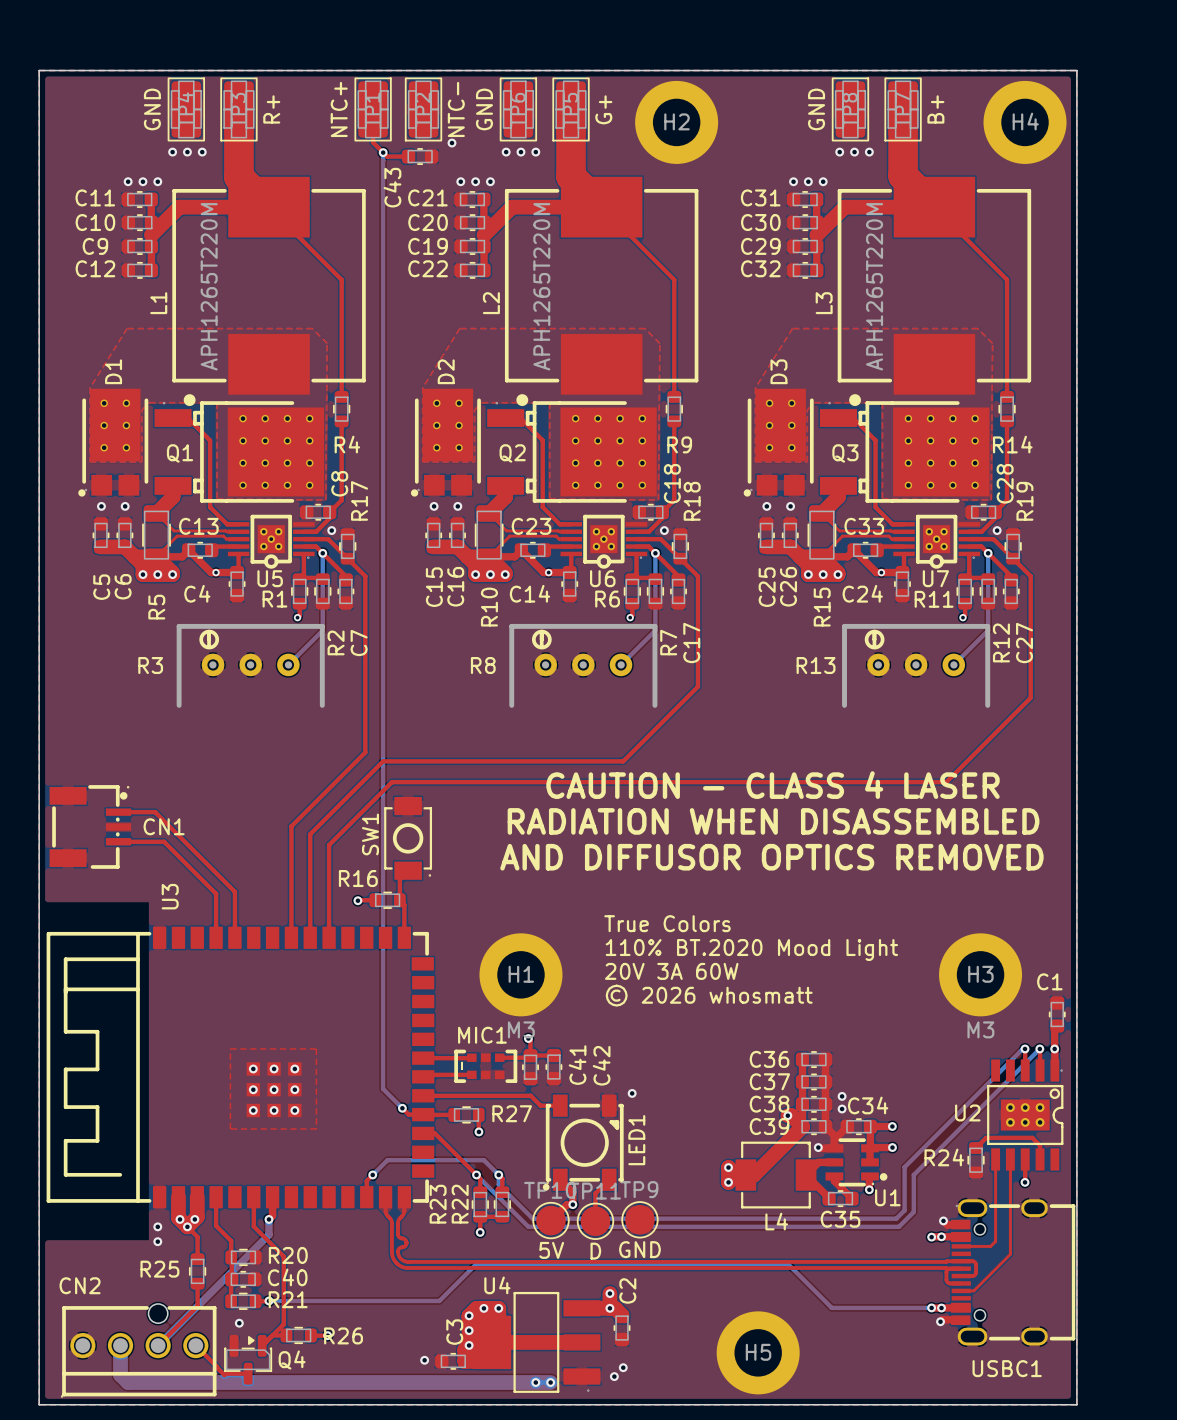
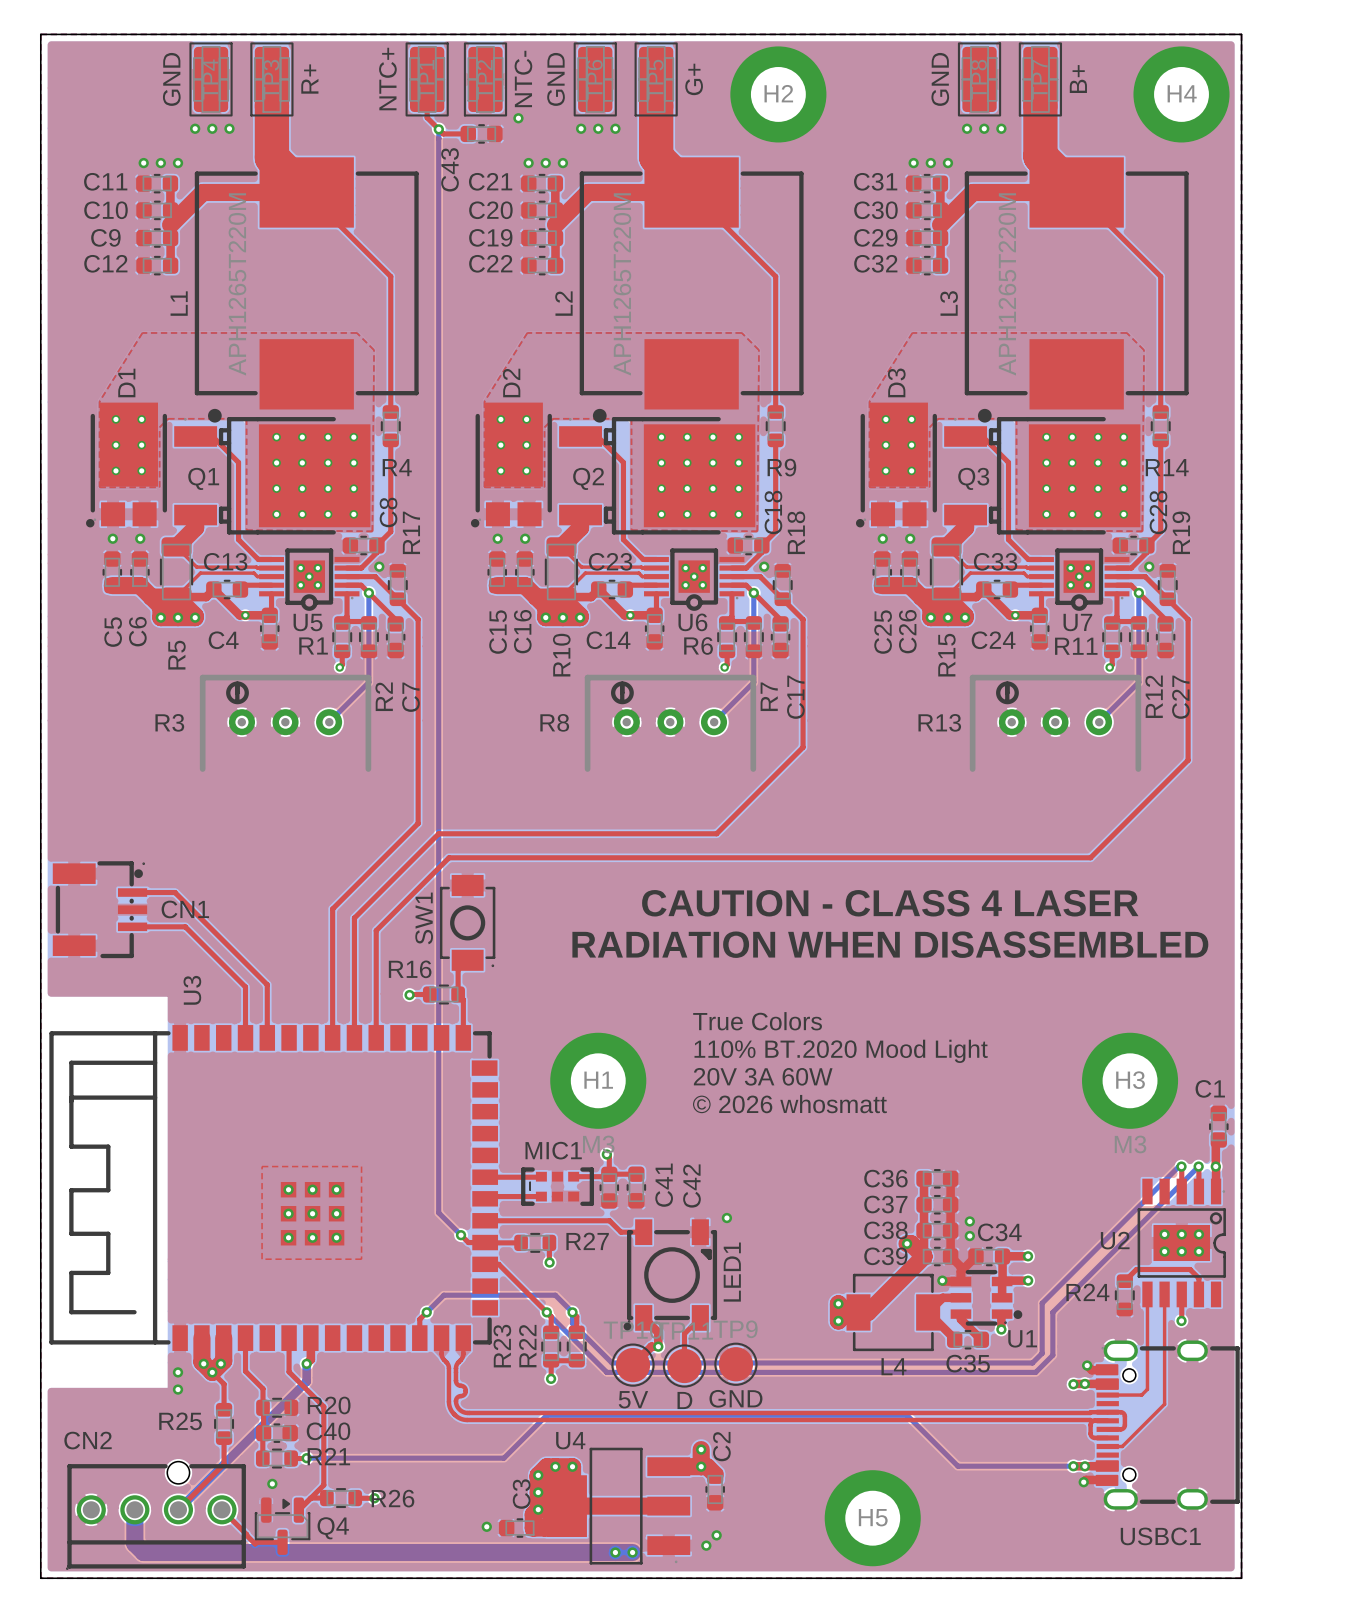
text: CAUTION - CLASS 4 LASER (773, 785) -> none
text: RADIATION WHEN DISASSEMBLED (773, 821) -> CAUTION - CLASS 4 LASER (890, 903)
text: AND DIFFUSOR OPTICS REMOVED (771, 857) -> RADIATION WHEN DISASSEMBLED (890, 944)

